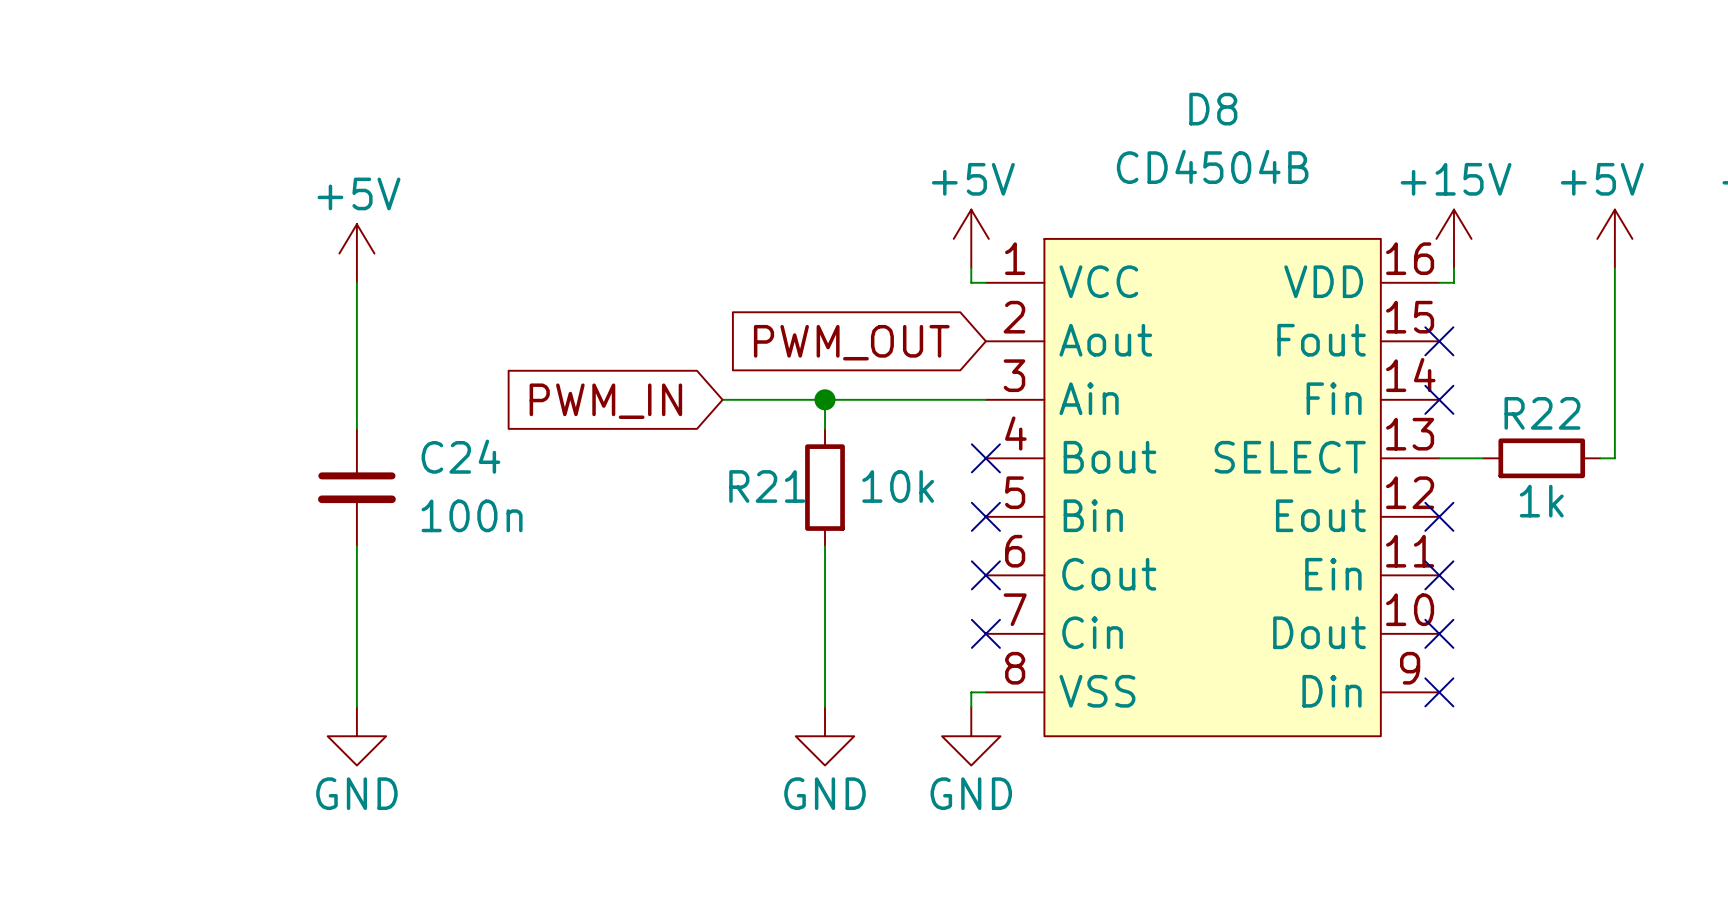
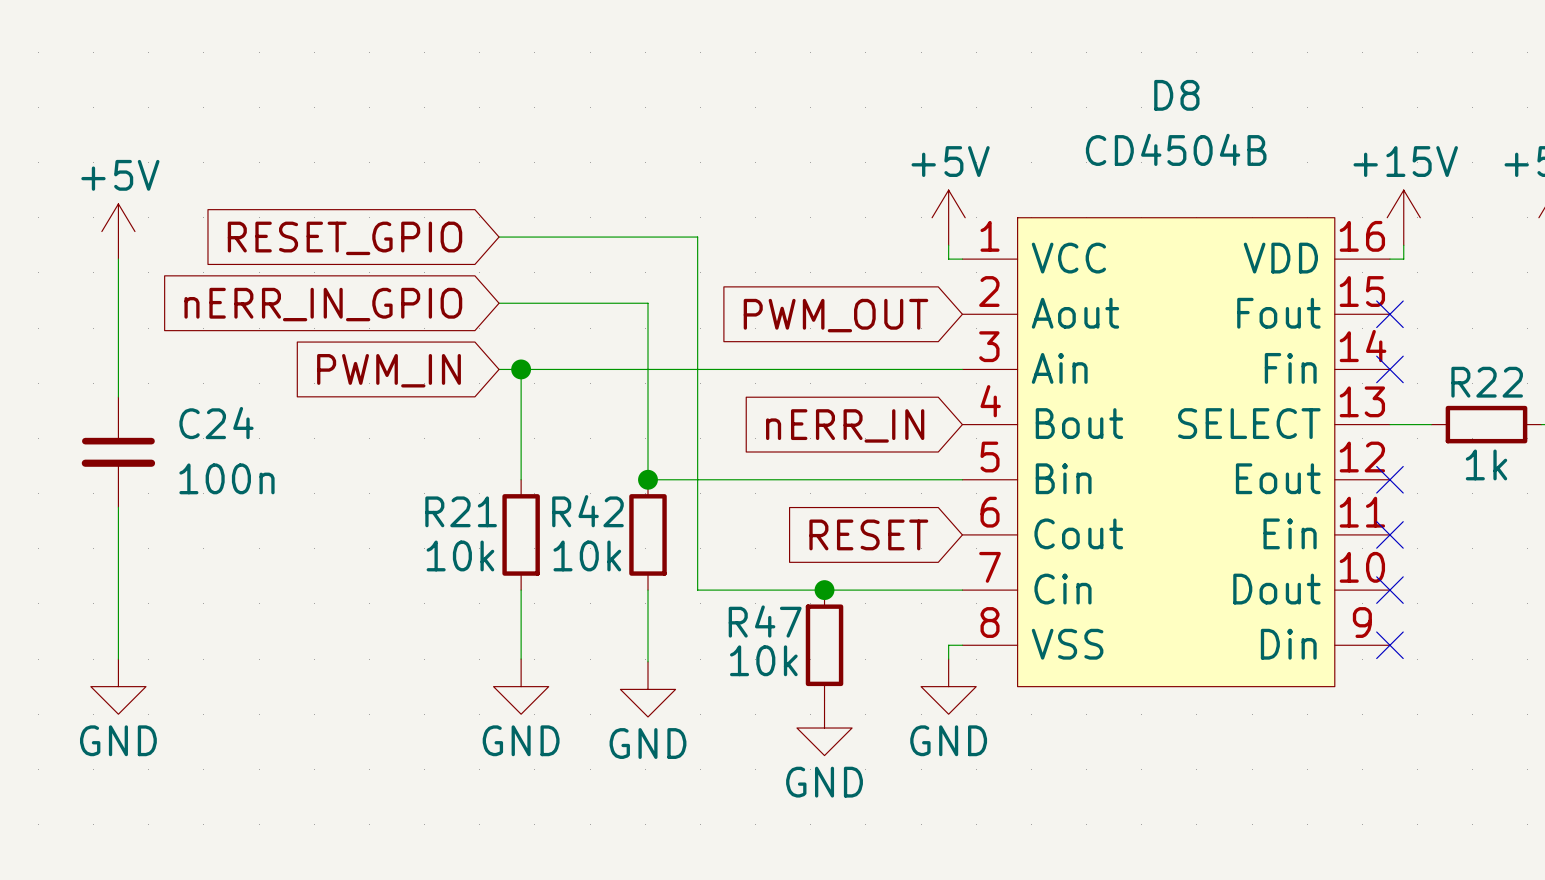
power symbol position: +5V (356, 253) -> +5V (118, 231)
wire: none -> (499, 237) (697, 237) (697, 590) (962, 590)
global label: none -> RESET_GPIO (345, 238)
wire: (356, 282) (356, 429) -> (118, 259) (118, 397)
wire: none -> (499, 303) (648, 303) (648, 479) (962, 479)
global label: none -> nERR_IN_GPIO (323, 304)
wire: none -> (499, 369) (714, 369)
wire: none -> (521, 369) (521, 479)
junction: none -> (521, 369)
wire: (825, 399) (825, 429) -> none
junction: (825, 399) -> none
global label position: PWM_IN (605, 401) -> PWM_IN (389, 370)
no-connect mark: (985, 458) -> none
global label: none -> nERR_IN (845, 425)
R21 name position: R21 (767, 486) -> R21 (461, 511)
R21 value position: 10k (898, 486) -> 10k (460, 555)
C24 position: (356, 487) -> (118, 452)
R21 position: (825, 487) -> (521, 534)
junction: none -> (648, 479)
no-connect mark: (985, 516) -> none
wire: (356, 546) (356, 707) -> (118, 507) (118, 659)
wire: (825, 546) (825, 707) -> none
R42: none -> 10k (648, 534)
global label: none -> RESET (868, 534)
no-connect mark: (985, 575) -> none
wire: none -> (521, 590) (521, 659)
wire: none -> (648, 590) (648, 661)
junction: none -> (824, 590)
no-connect mark: (985, 633) -> none
R47: none -> 10k (824, 645)
power symbol: none -> GND (118, 686)
power symbol: GND (356, 736) -> none
power symbol: none -> GND (521, 686)
power symbol position: GND (825, 736) -> GND (824, 728)
power symbol: none -> GND (648, 689)

